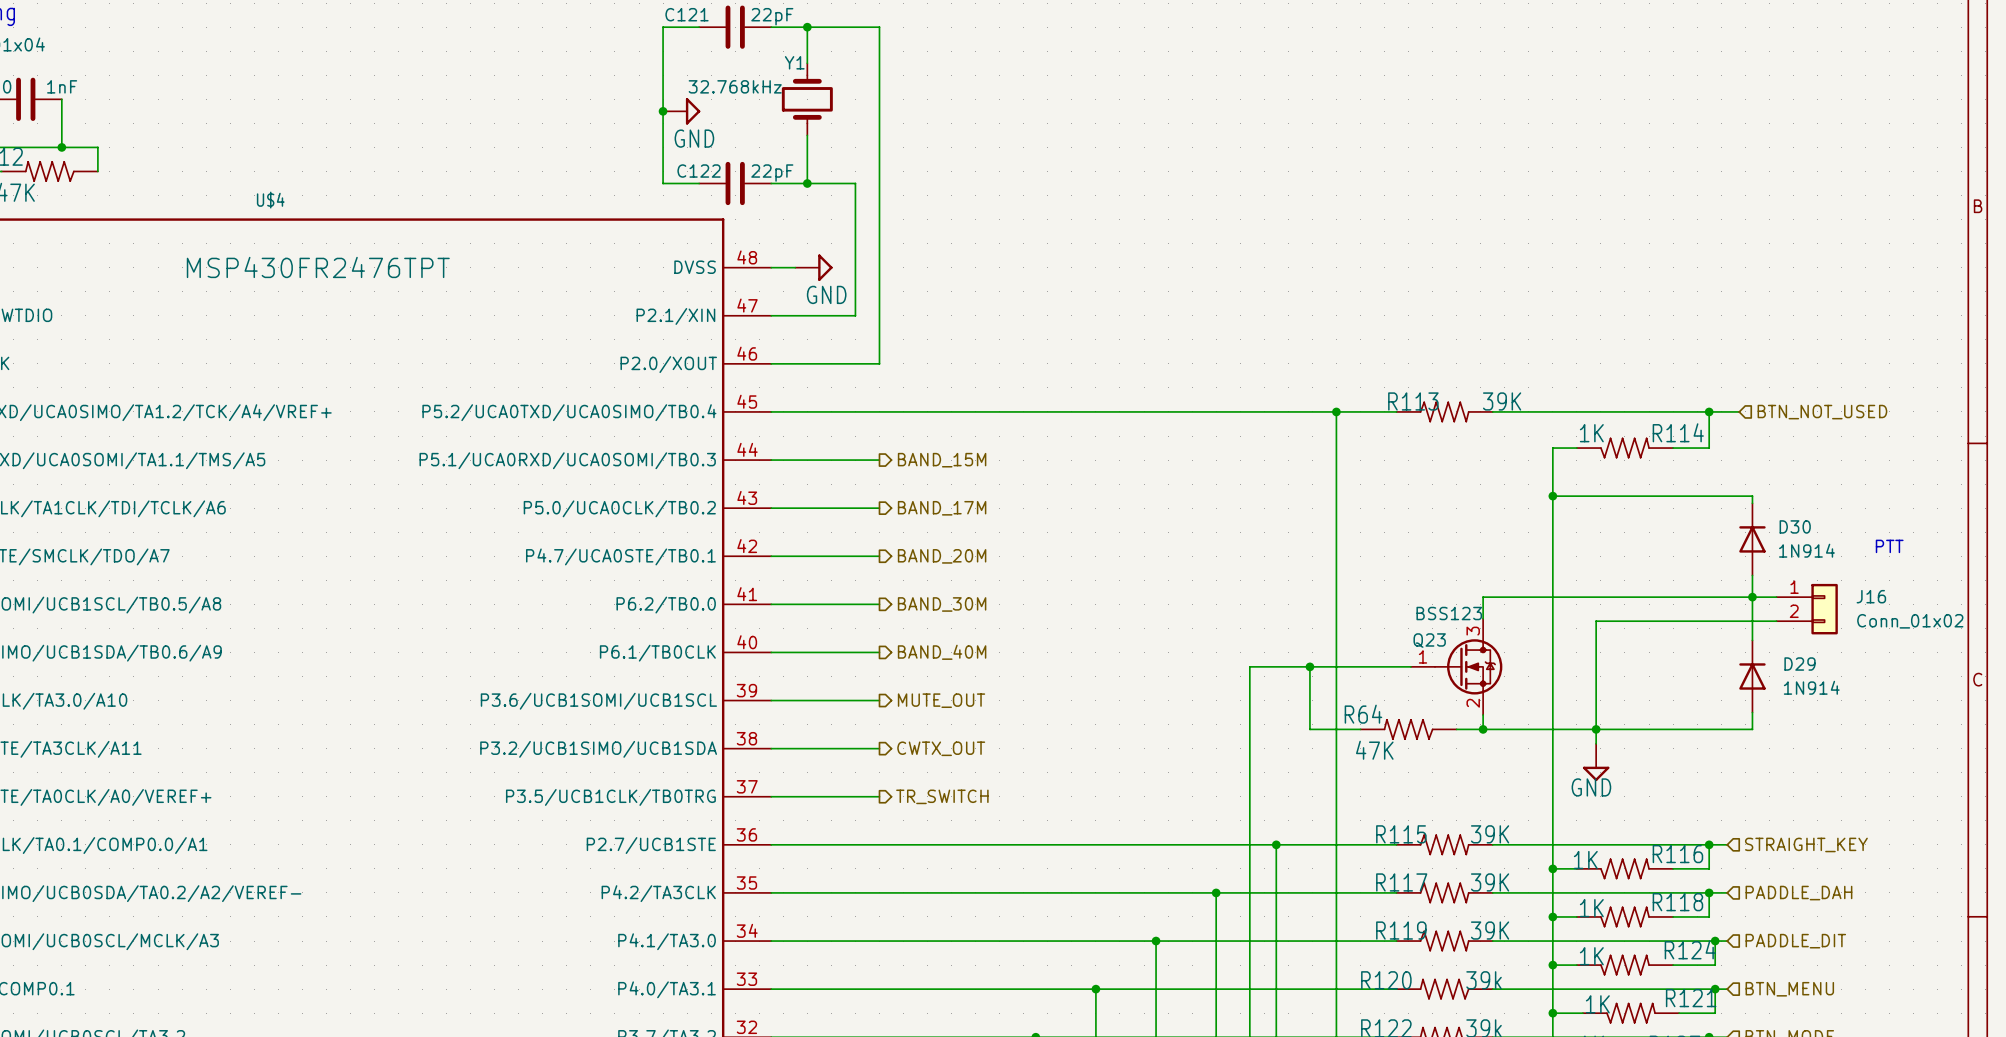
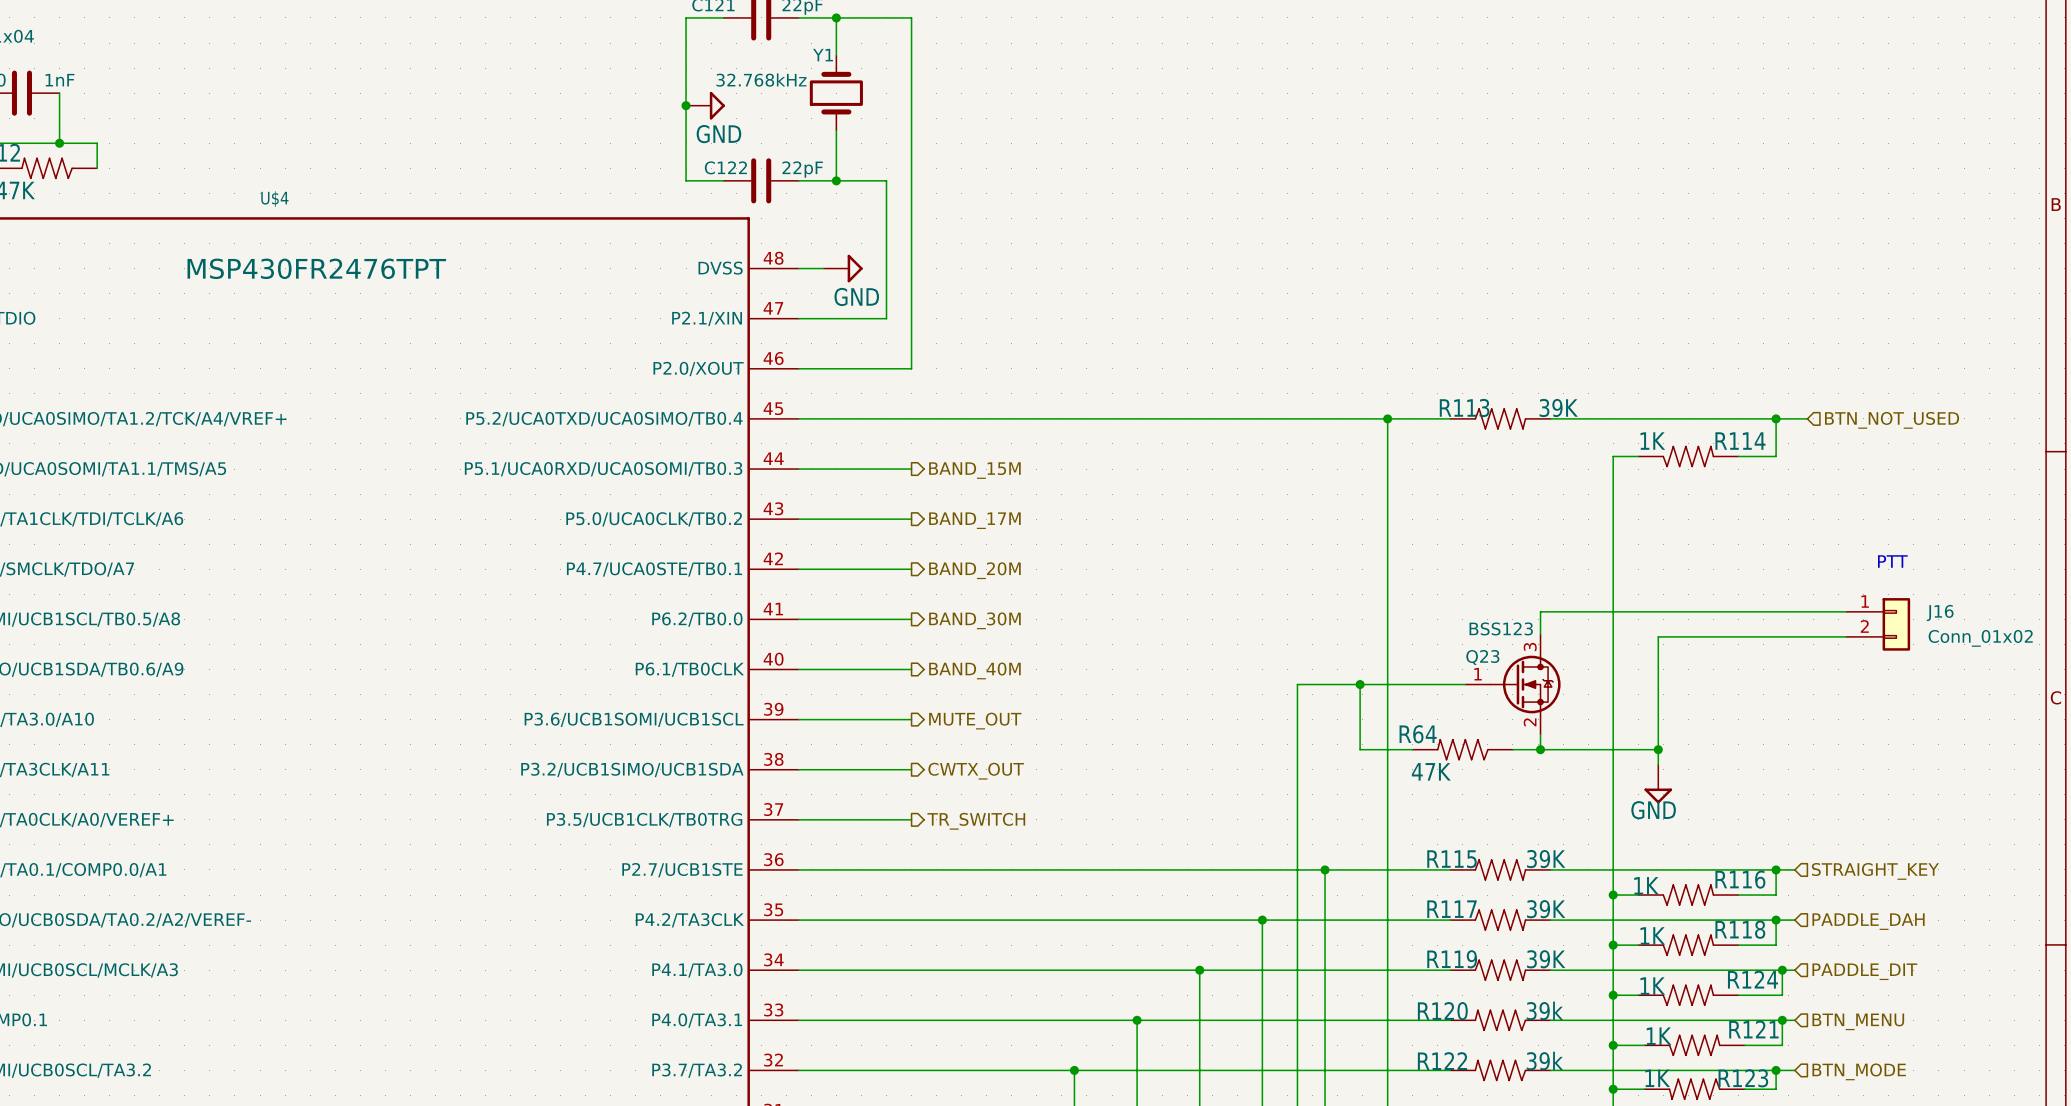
wire: (1552, 496) (1752, 496) (1752, 503) -> none
junction: (1552, 496) -> none
D30: 1N914 (1752, 539) -> none
text position: PTT (1889, 546) -> PTT (1892, 561)
wire: (1752, 575) (1752, 640) -> none
junction: (1752, 597) -> none
D29: 1N914 (1752, 676) -> none
wire: (1752, 712) (1752, 729) (1596, 729) -> none

